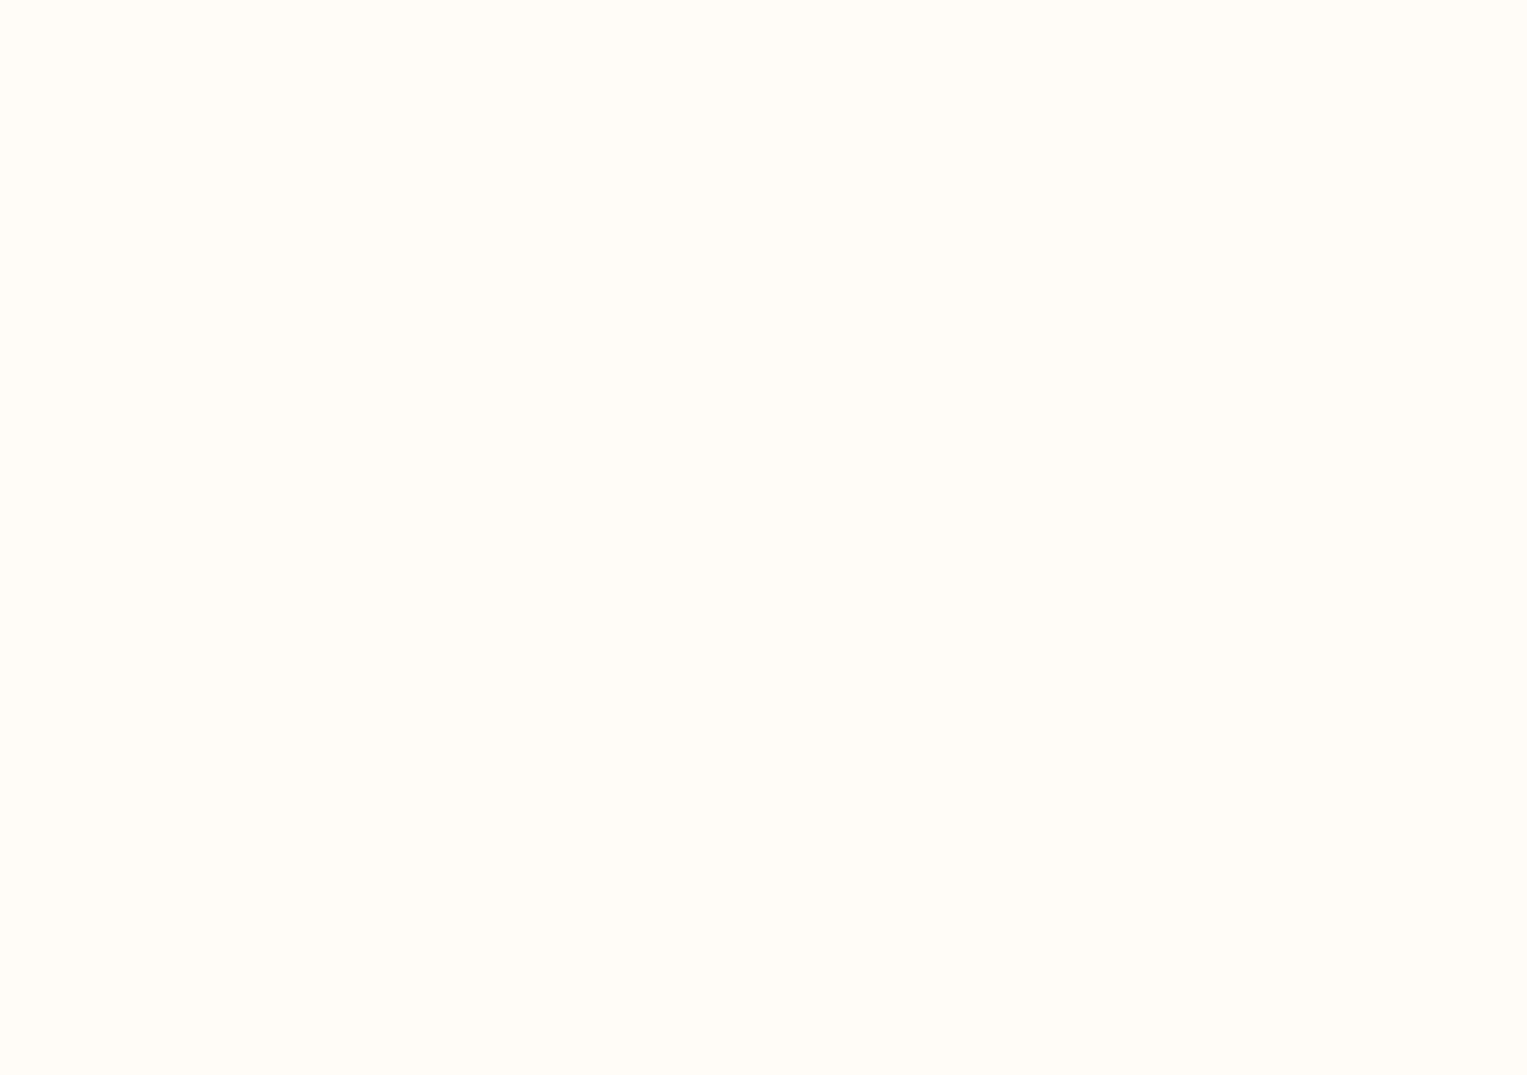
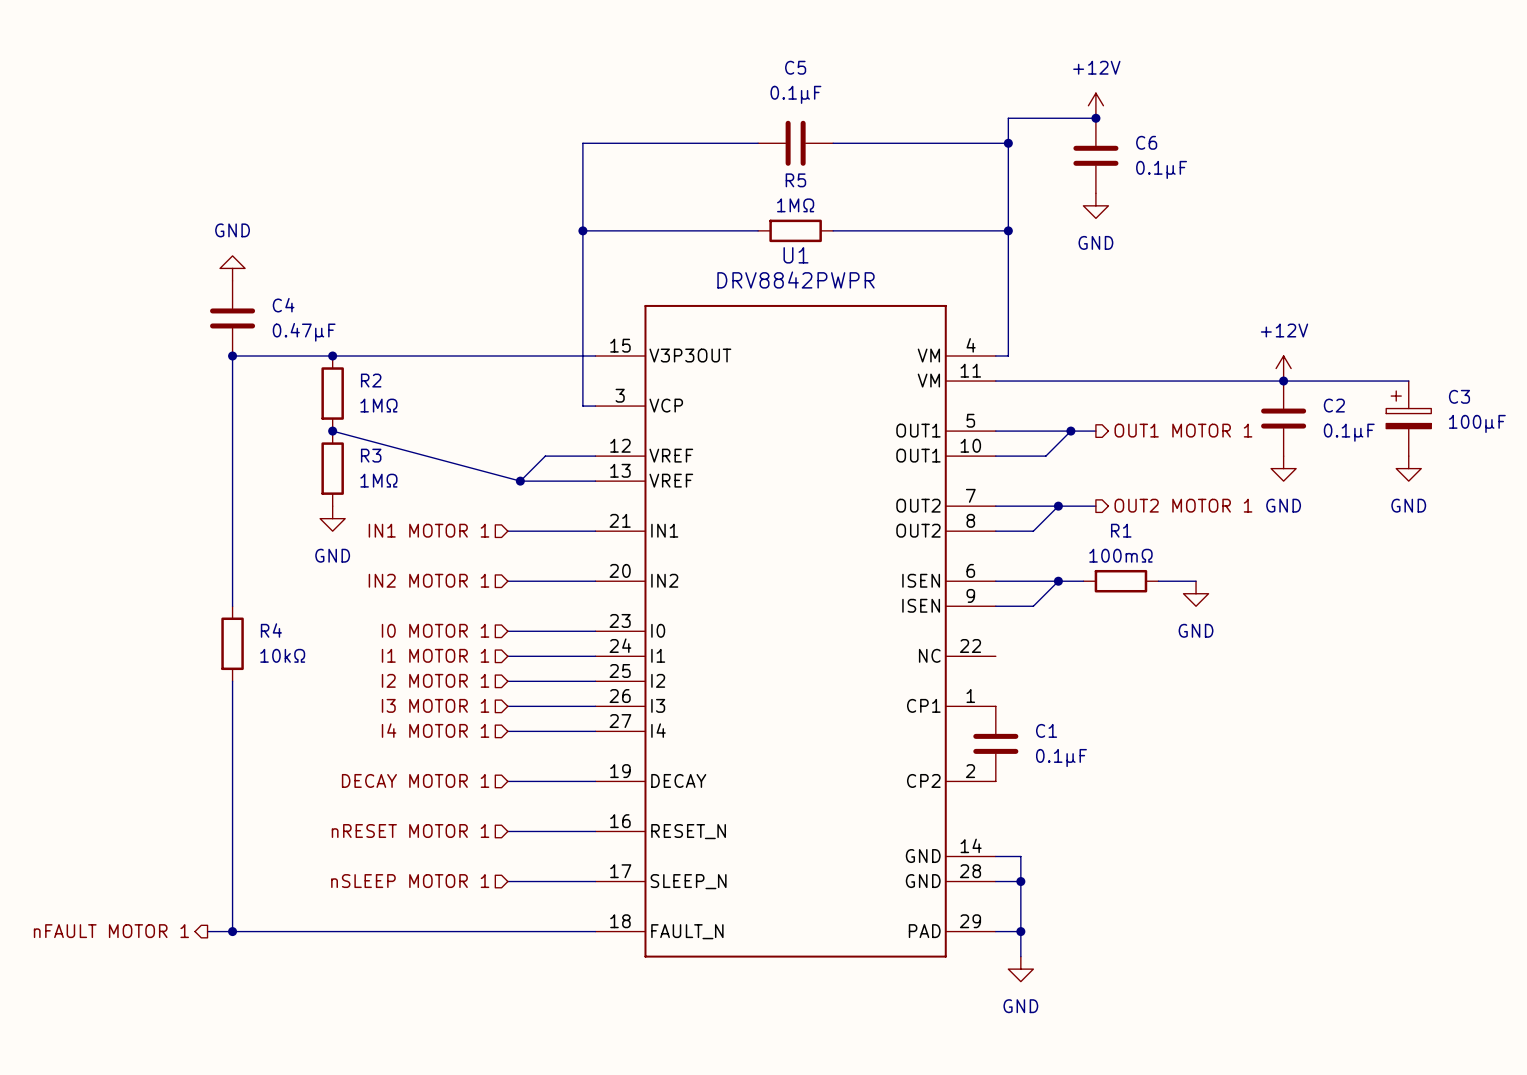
power symbol: none -> +12V (1095, 105)
wire: none -> (1095, 118) (1008, 118) (1008, 356) (995, 356)
junction: none -> (1095, 118)
wire: none -> (758, 143) (582, 143) (582, 406) (595, 406)
C5: none -> 0.1µF (795, 143)
wire: none -> (833, 143) (1008, 143)
junction: none -> (1008, 143)
C6: none -> 0.1µF (1095, 155)
power symbol: none -> GND (1095, 205)
wire: none -> (582, 230) (758, 230)
junction: none -> (582, 230)
R5: none -> 1MΩ (795, 230)
wire: none -> (833, 230) (1008, 230)
junction: none -> (1008, 230)
power symbol: none -> GND (232, 268)
C4: none -> 0.47µF (232, 318)
junction: none -> (232, 356)
junction: none -> (332, 356)
wire: none -> (595, 356) (232, 356) (232, 606)
power symbol: none -> +12V (1283, 368)
wire: none -> (995, 381) (1408, 381)
junction: none -> (1283, 381)
R2: none -> 1MΩ (332, 393)
C2: none -> 0.1µF (1283, 418)
C3: none -> 100µF (1408, 418)
hierarchical label: none -> OUT1 MOTOR 1 (1183, 430)
wire: none -> (332, 431) (520, 481)
junction: none -> (332, 431)
wire: none -> (995, 431) (1095, 431)
wire: none -> (1070, 431) (1045, 456) (995, 456)
junction: none -> (1070, 431)
wire: none -> (595, 456) (545, 456) (520, 481)
R3: none -> 1MΩ (332, 468)
power symbol: none -> GND (1283, 468)
power symbol: none -> GND (1408, 468)
wire: none -> (520, 481) (595, 481)
junction: none -> (520, 481)
hierarchical label: none -> OUT2 MOTOR 1 (1183, 505)
wire: none -> (995, 506) (1095, 506)
wire: none -> (1058, 506) (1033, 531) (995, 531)
junction: none -> (1058, 506)
power symbol: none -> GND (332, 518)
hierarchical label: none -> IN1 MOTOR 1 (428, 530)
wire: none -> (507, 531) (595, 531)
hierarchical label: none -> IN2 MOTOR 1 (428, 580)
wire: none -> (507, 581) (595, 581)
wire: none -> (995, 581) (1083, 581)
wire: none -> (1058, 581) (1033, 606) (995, 606)
junction: none -> (1058, 581)
R1: none -> 100mΩ (1120, 581)
wire: none -> (1158, 581) (1196, 581)
power symbol: none -> GND (1196, 593)
hierarchical label: none -> I0 MOTOR 1 (435, 630)
wire: none -> (507, 631) (595, 631)
U1: none -> DRV8842PWPR (795, 631)
R4: none -> 10kΩ (232, 643)
hierarchical label: none -> I1 MOTOR 1 (435, 655)
wire: none -> (507, 656) (595, 656)
hierarchical label: none -> I2 MOTOR 1 (435, 680)
wire: none -> (232, 681) (232, 931)
wire: none -> (507, 681) (595, 681)
hierarchical label: none -> I3 MOTOR 1 (435, 705)
wire: none -> (507, 706) (595, 706)
hierarchical label: none -> I4 MOTOR 1 (435, 730)
wire: none -> (507, 731) (595, 731)
C1: none -> 0.1µF (995, 743)
hierarchical label: none -> DECAY MOTOR 1 (415, 780)
wire: none -> (507, 781) (595, 781)
hierarchical label: none -> nRESET MOTOR 1 (410, 831)
wire: none -> (507, 831) (595, 831)
wire: none -> (995, 856) (1020, 856) (1020, 956)
hierarchical label: none -> nSLEEP MOTOR 1 (410, 881)
wire: none -> (507, 881) (595, 881)
wire: none -> (995, 881) (1020, 881)
junction: none -> (1020, 881)
hierarchical label: none -> nFAULT MOTOR 1 (111, 931)
wire: none -> (207, 931) (595, 931)
junction: none -> (232, 931)
wire: none -> (995, 931) (1020, 931)
junction: none -> (1020, 931)
power symbol: none -> GND (1020, 969)

